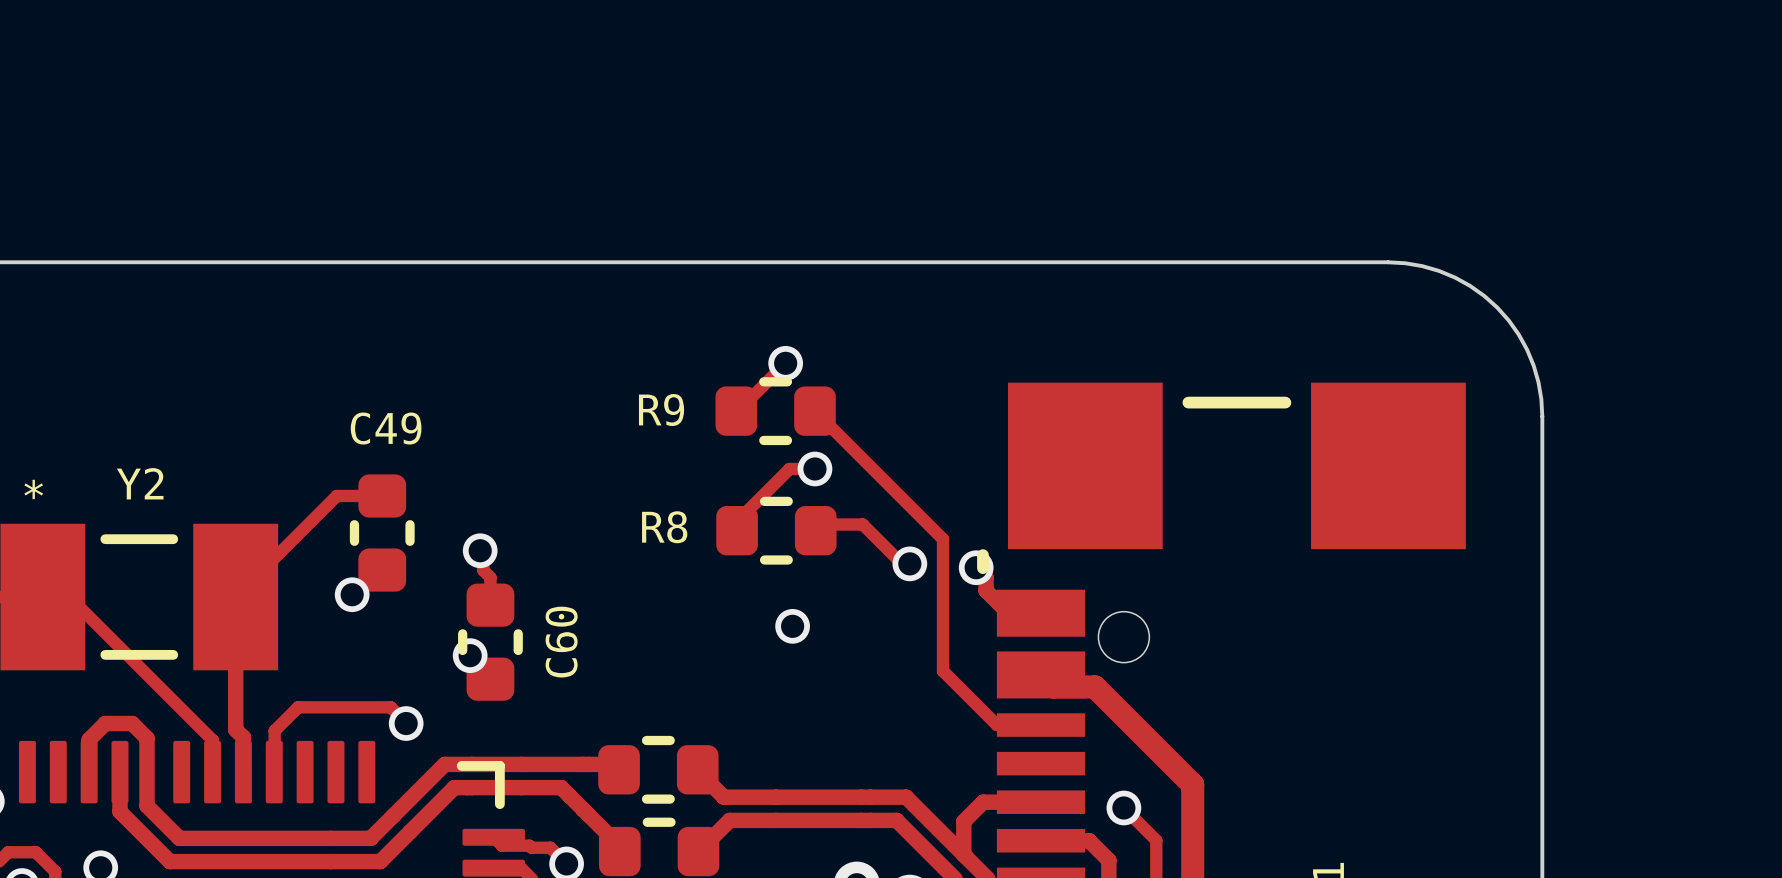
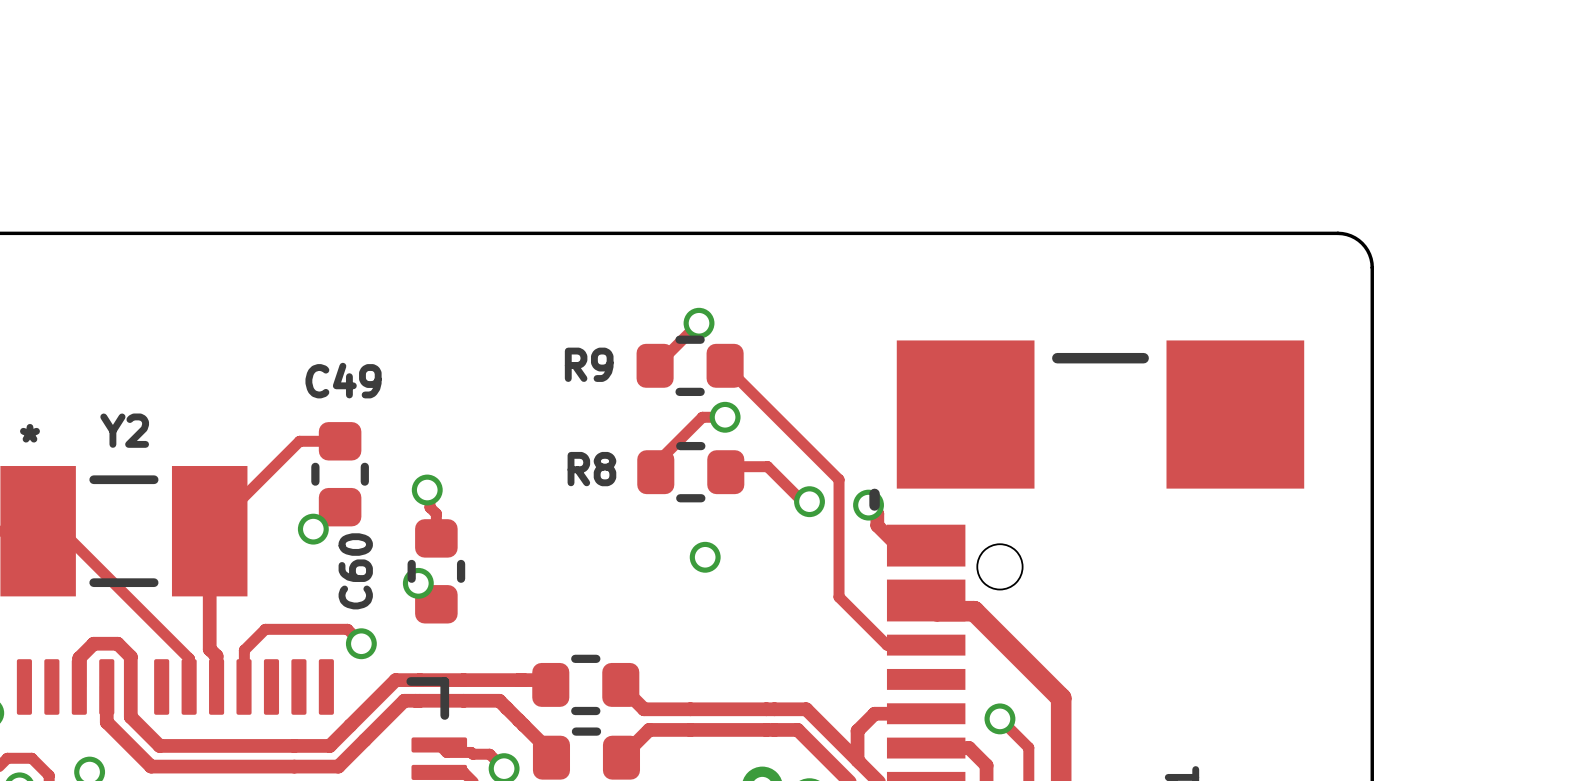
board edge: (1388, 262) (1405, 263) (1439, 270) (1470, 285) (1497, 307) (1508, 320) (1527, 349) (1538, 382) (1542, 416) -> (1235, 233) (1342, 233) (1355, 237) (1362, 243) (1369, 254) (1371, 263) (1372, 370)
C60 name position: C60 (561, 642) -> C60 (355, 571)

